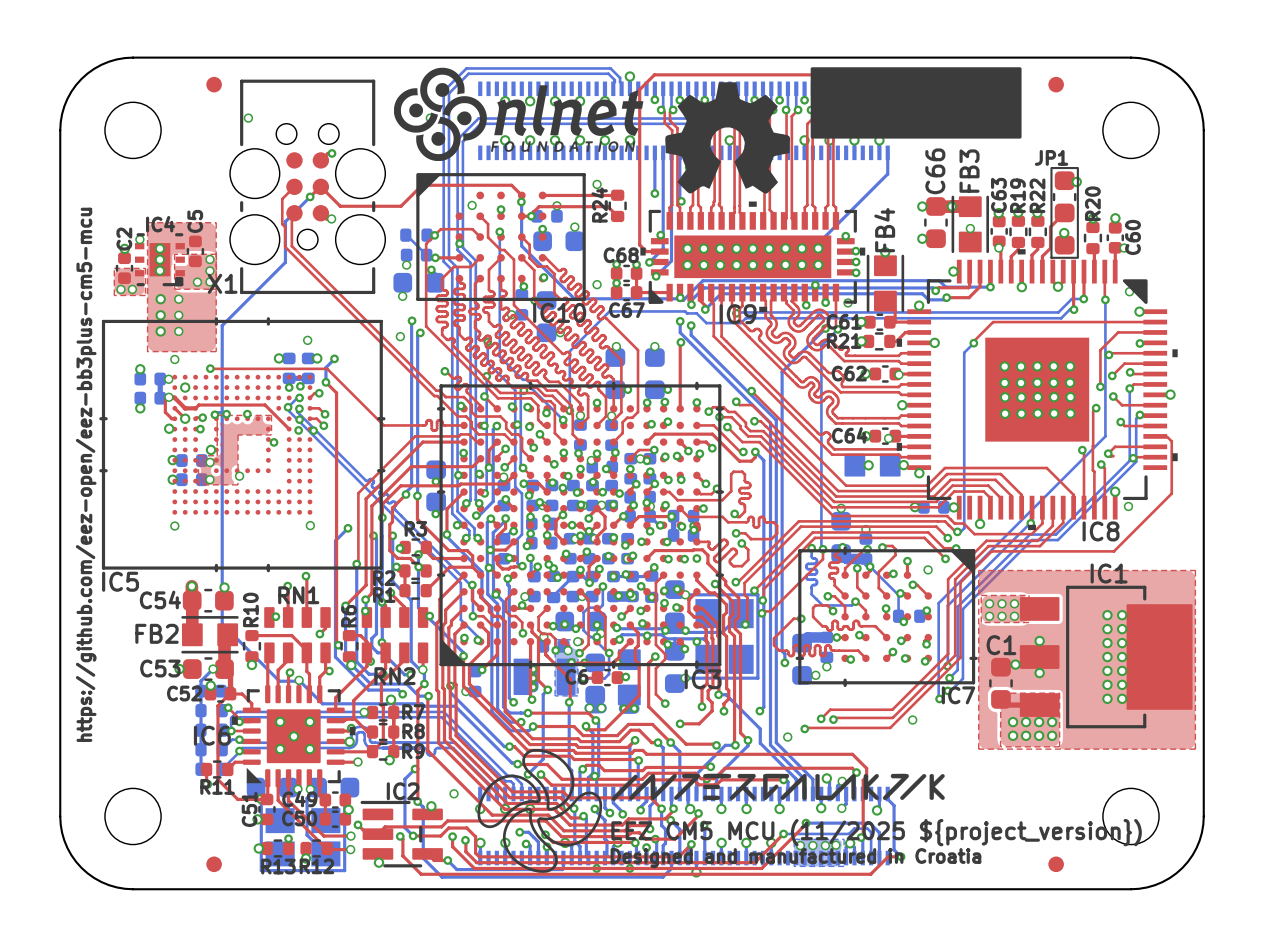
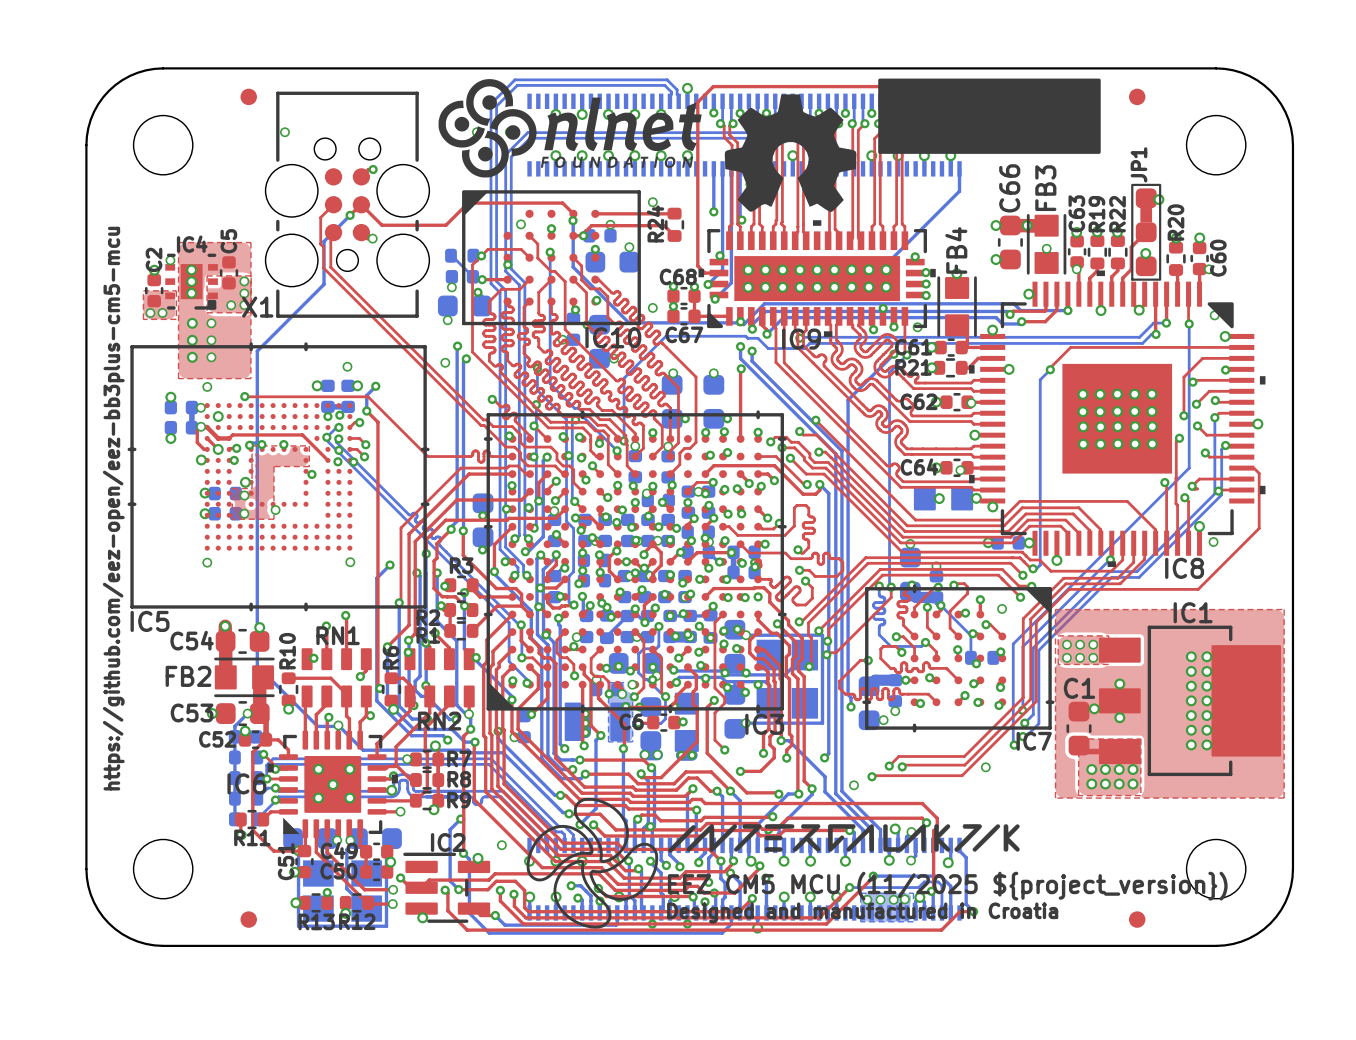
JP1 footprint: [1050, 166, 1079, 259] -> [1131, 183, 1162, 281]

